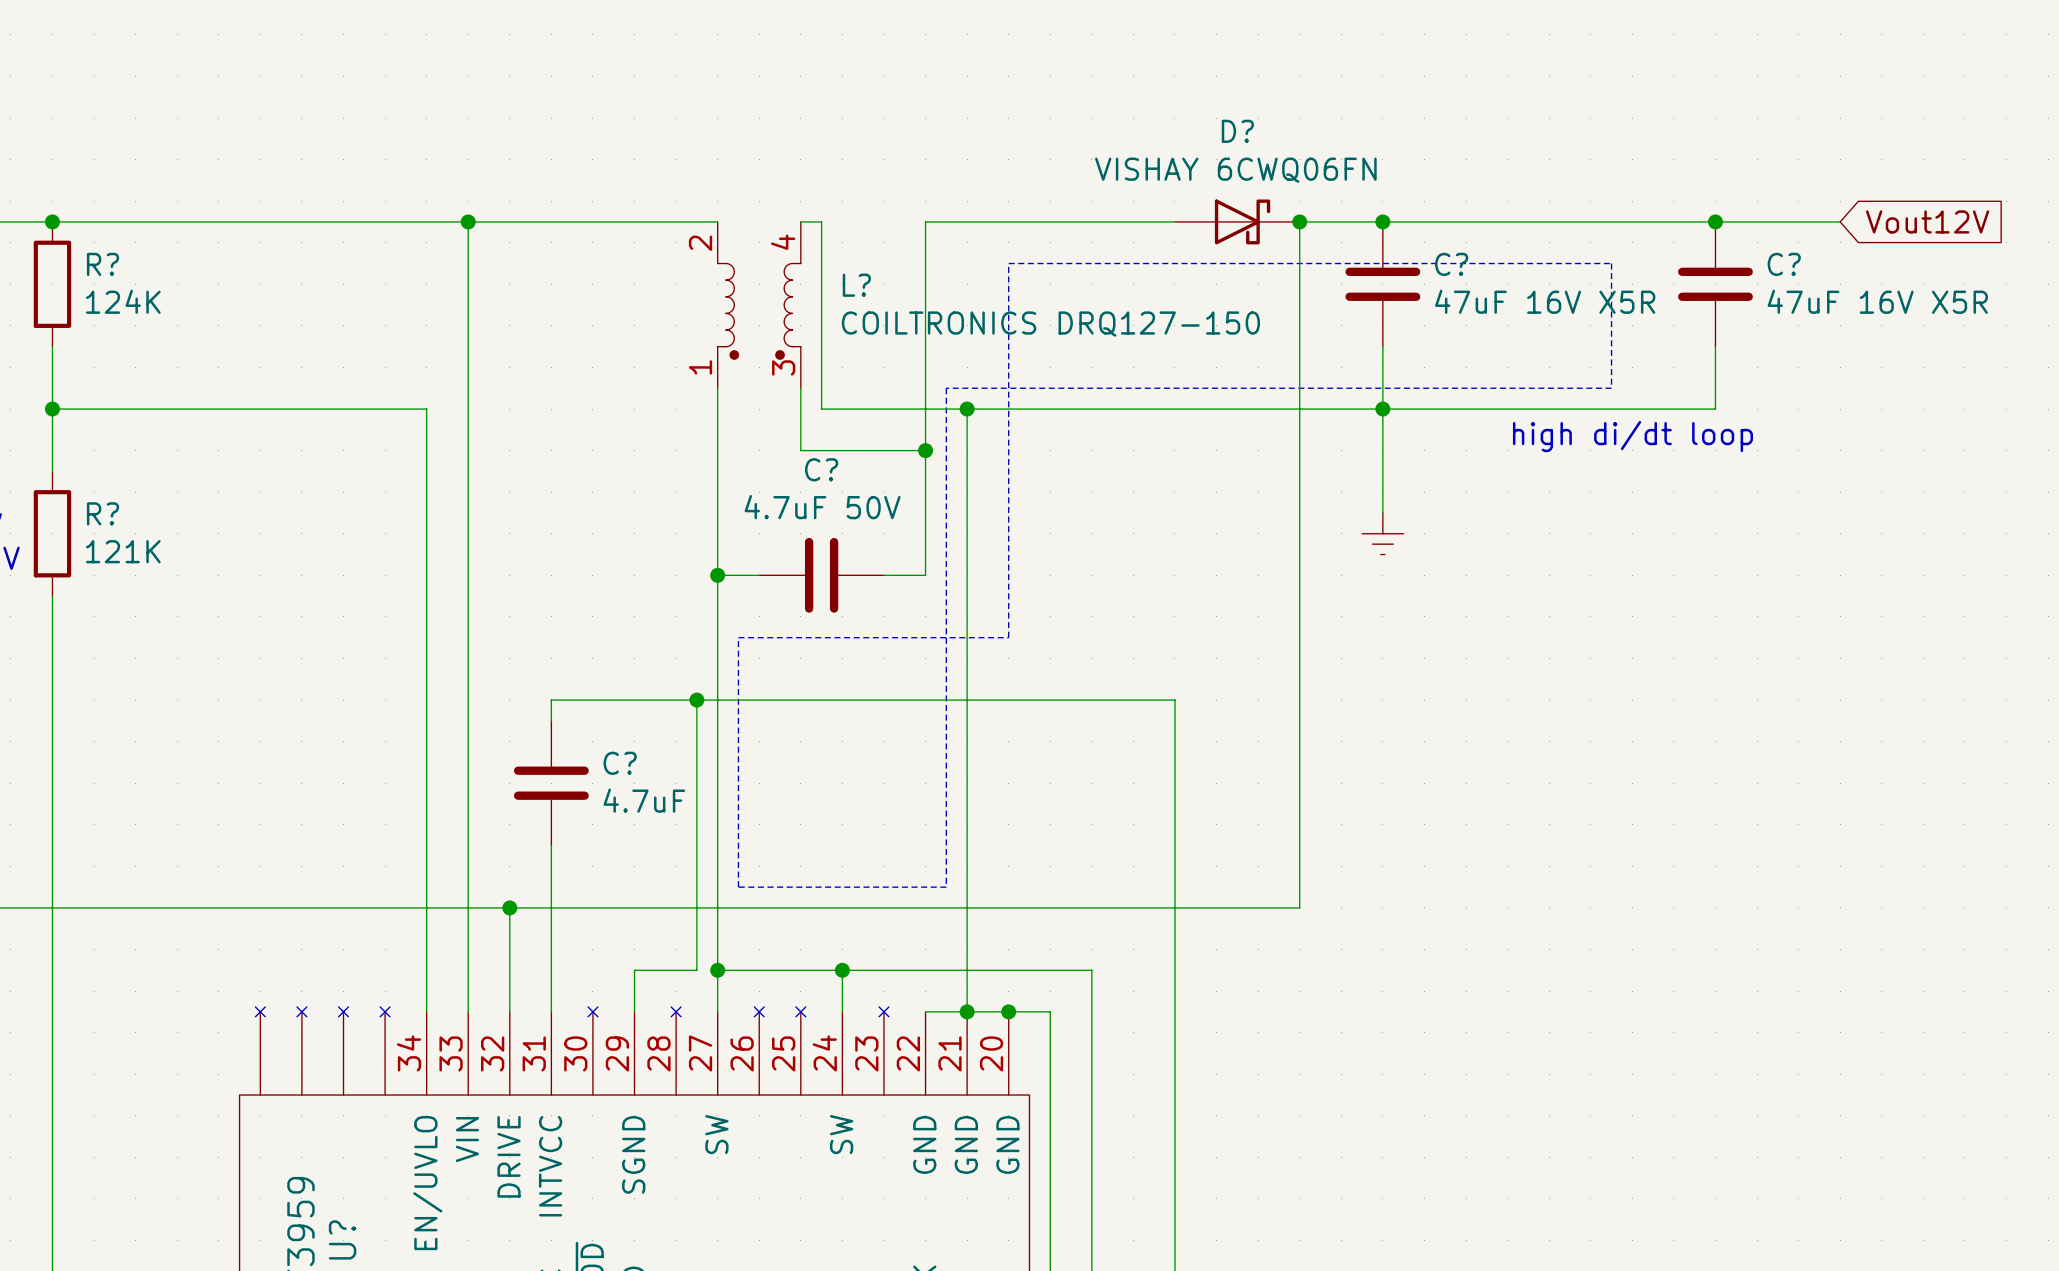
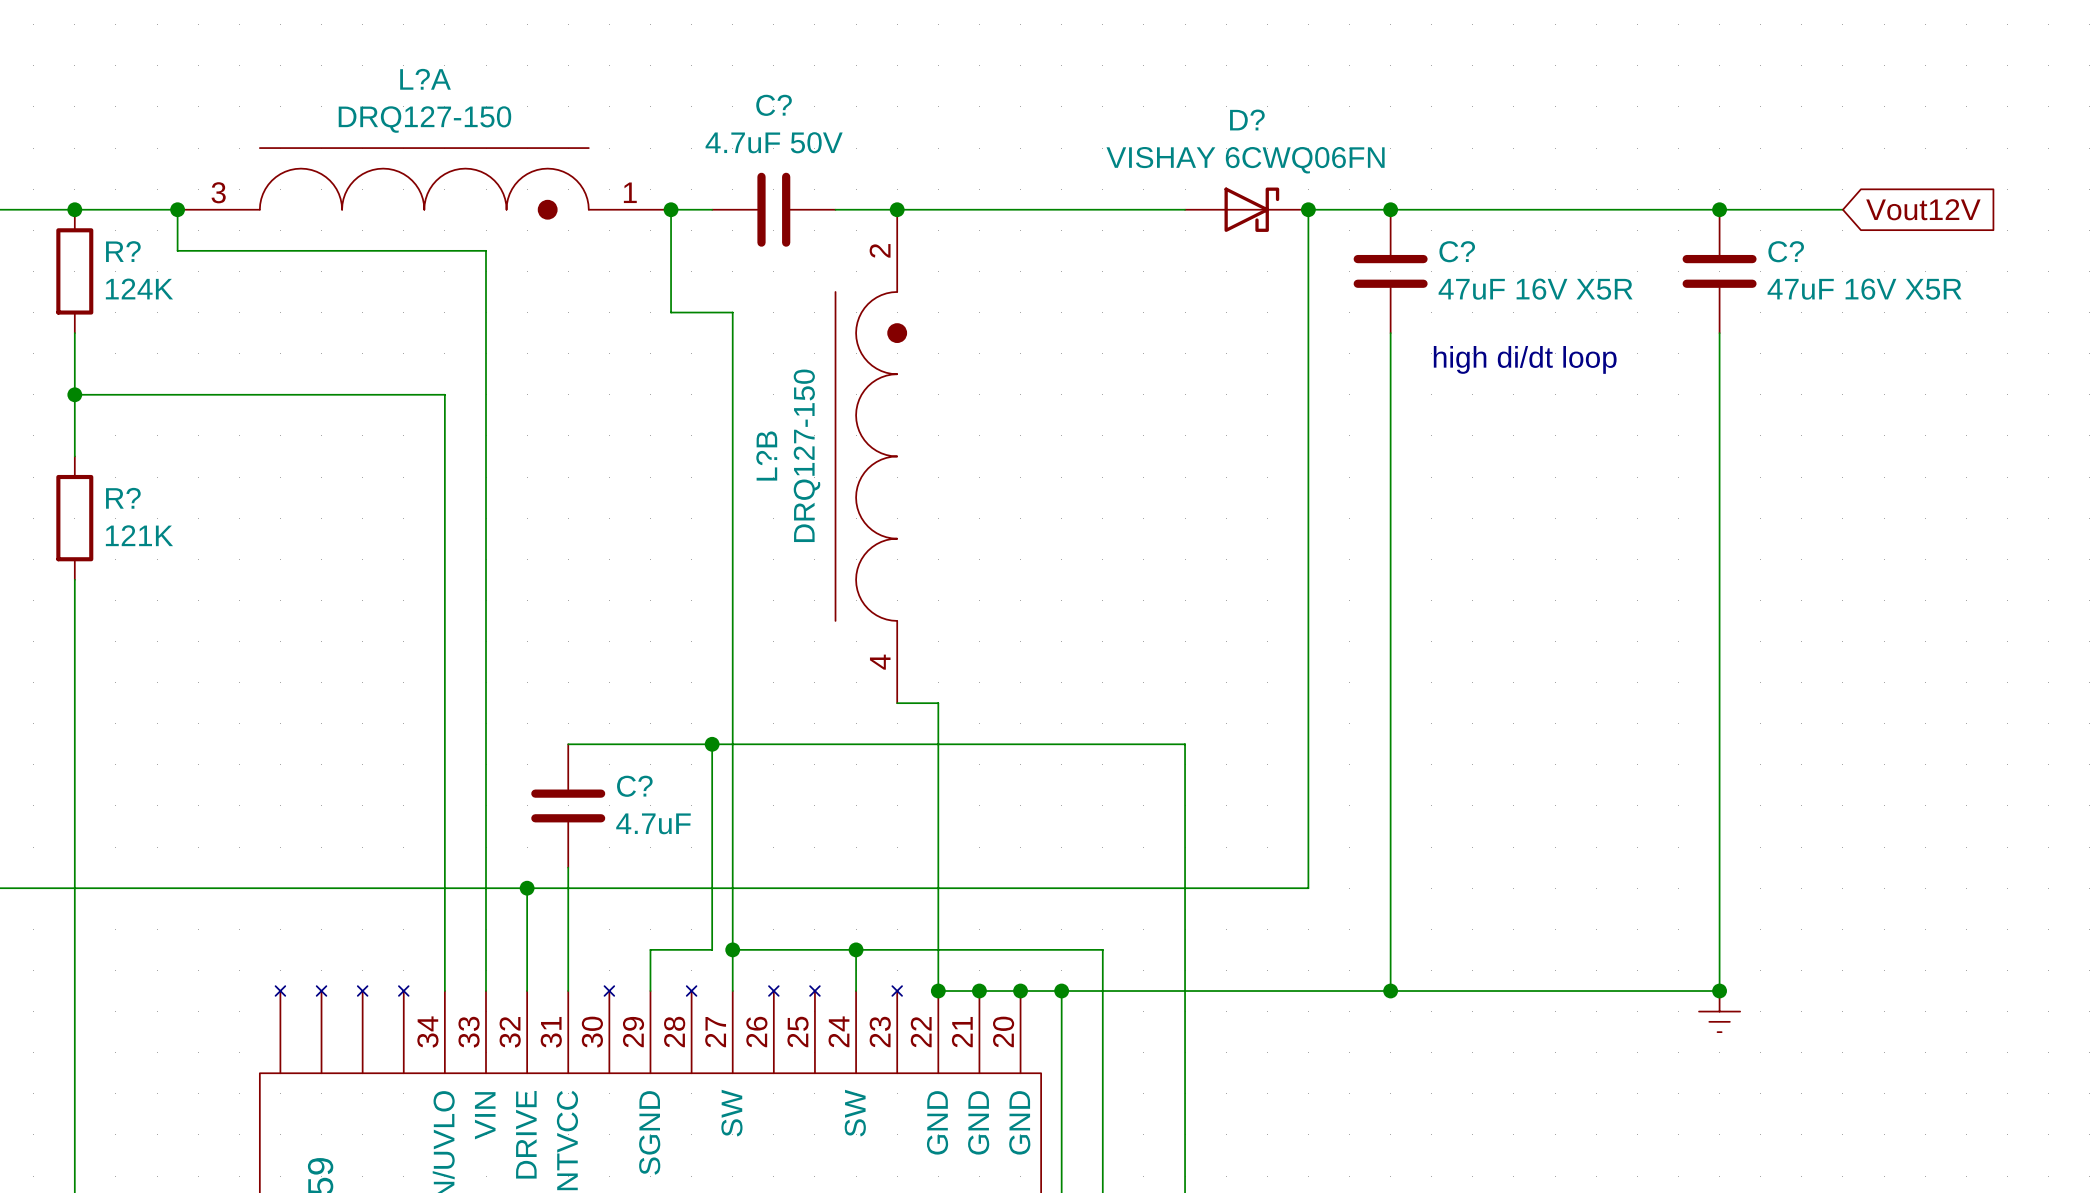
L?A: none -> DRQ127-150 (424, 183)
wire: (156, 221) (655, 221) -> (177, 209) (177, 250) (486, 250)
junction: none -> (177, 209)
wire: (468, 221) (468, 263) -> none
junction: (468, 221) -> none
wire: none -> (671, 209) (671, 312) (732, 312) (732, 374)
junction: none -> (671, 209)
wire: (800, 221) (821, 221) (821, 409) (1715, 409) -> (1061, 991) (1719, 991) (1719, 394)
junction: none -> (897, 209)
wire: (925, 221) (925, 575) (883, 575) -> (938, 209) (835, 209)
line: (1008, 263) (1008, 637) (738, 637) (738, 887) (946, 887) (946, 388) (1611, 388) (1611, 263) (1008, 263) -> none
L?: COILTRONICS DRQ127-150 (759, 305) -> none
wire: (800, 388) (800, 450) (925, 450) -> none
wire: (967, 409) (967, 1011) -> none
junction: (967, 409) -> none
junction: (1382, 409) -> none
text position: high di/dt loop (1632, 436) -> high di/dt loop (1525, 359)
junction: (925, 450) -> none
L?B: none -> DRQ127-150 (870, 456)
wire: none -> (1390, 497) (1390, 991)
power symbol: (1382, 533) -> none
wire: (717, 575) (759, 575) -> none
junction: (717, 575) -> none
C? position: (821, 575) -> (773, 209)
wire: (696, 700) (696, 762) -> none
junction position: (696, 700) -> (712, 744)
wire: (551, 720) (551, 700) (1174, 700) (1174, 762) -> (568, 744) (1185, 744)
wire: none -> (897, 703) (938, 703) (938, 991)
C? position: (551, 783) -> (568, 805)
junction: none -> (938, 991)
junction: none -> (1061, 991)
junction: none -> (1390, 991)
junction: none -> (1719, 991)
power symbol: none -> (1719, 1011)

